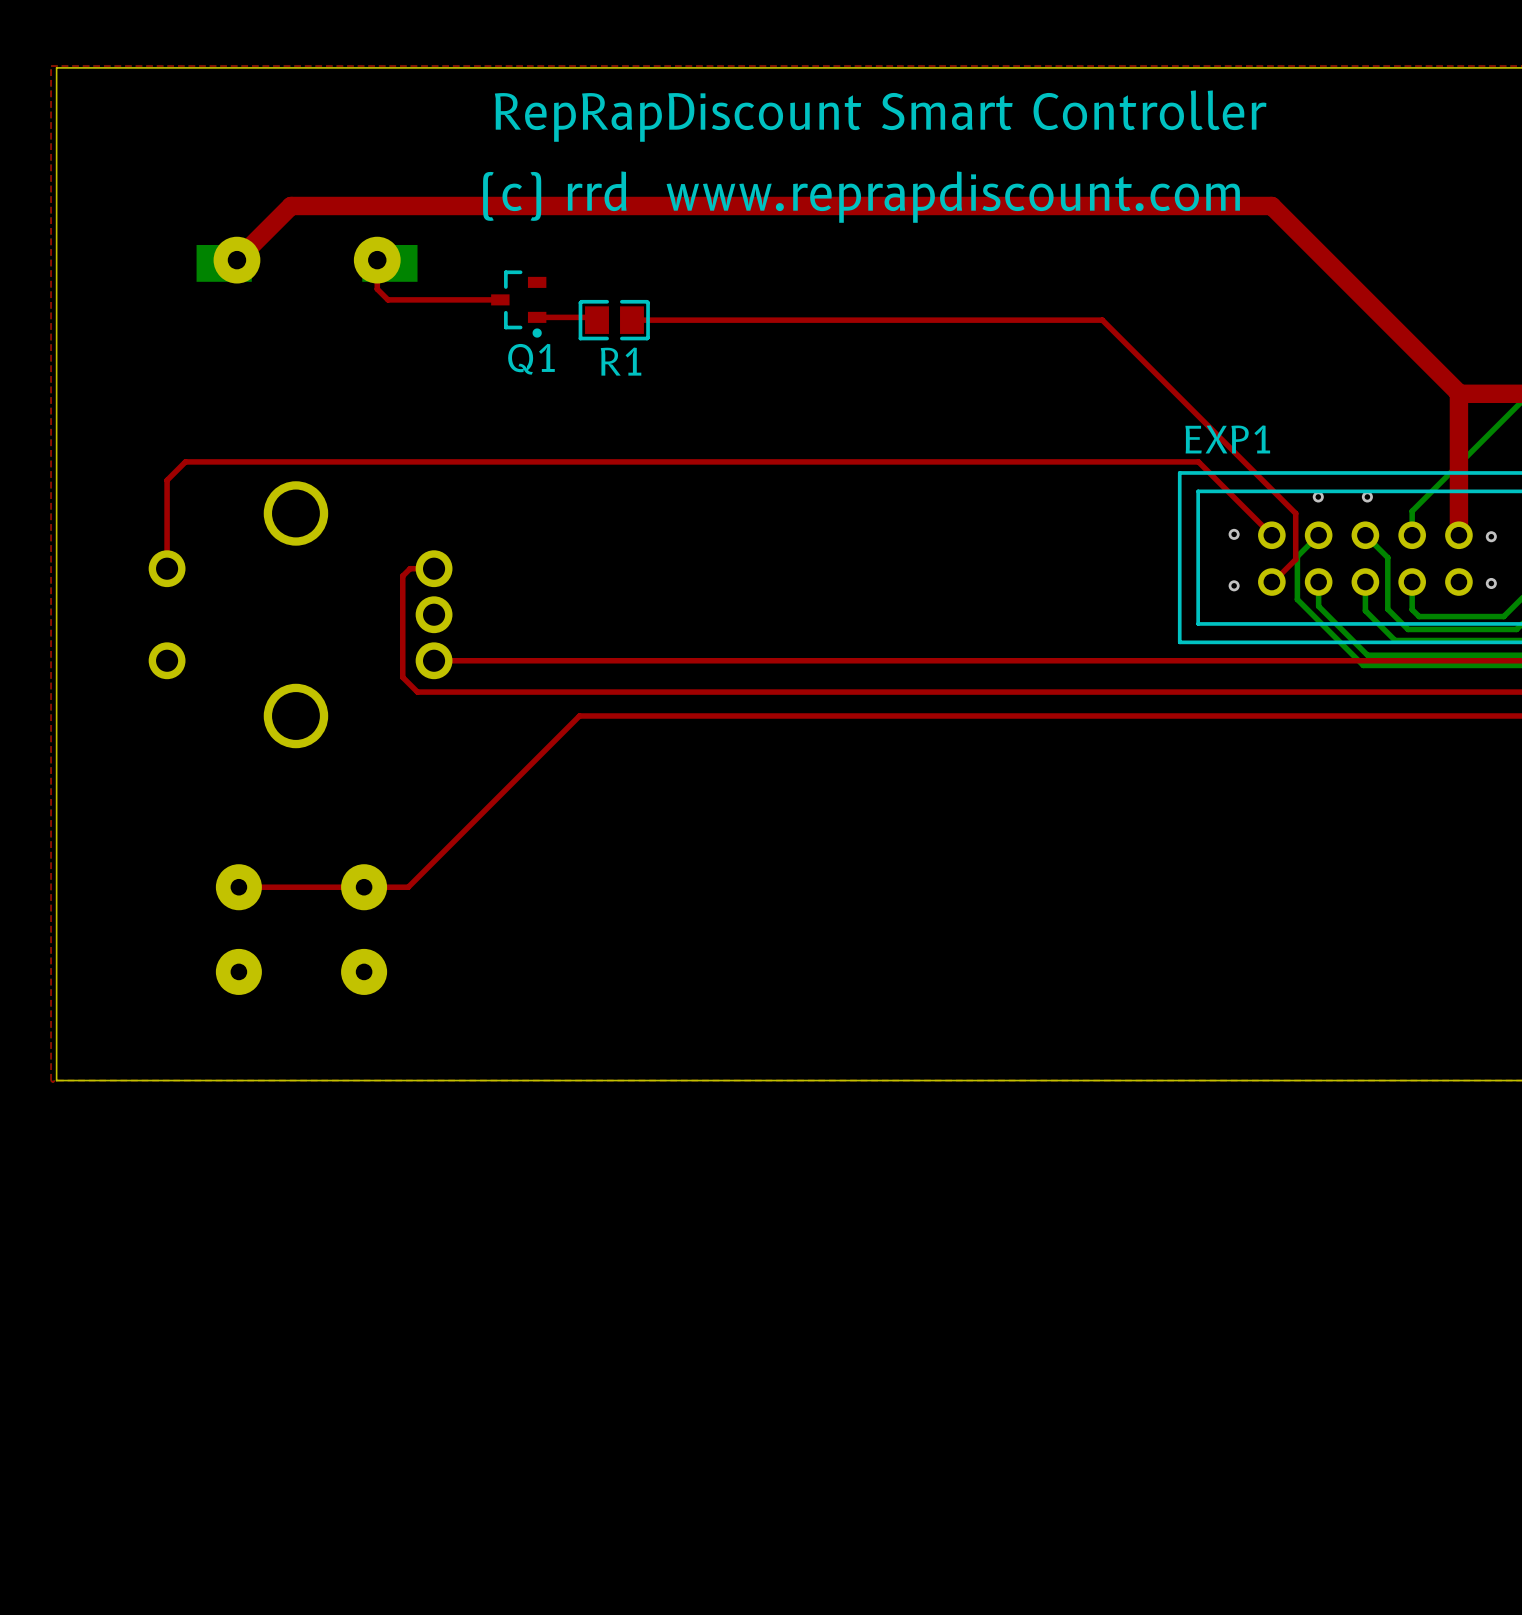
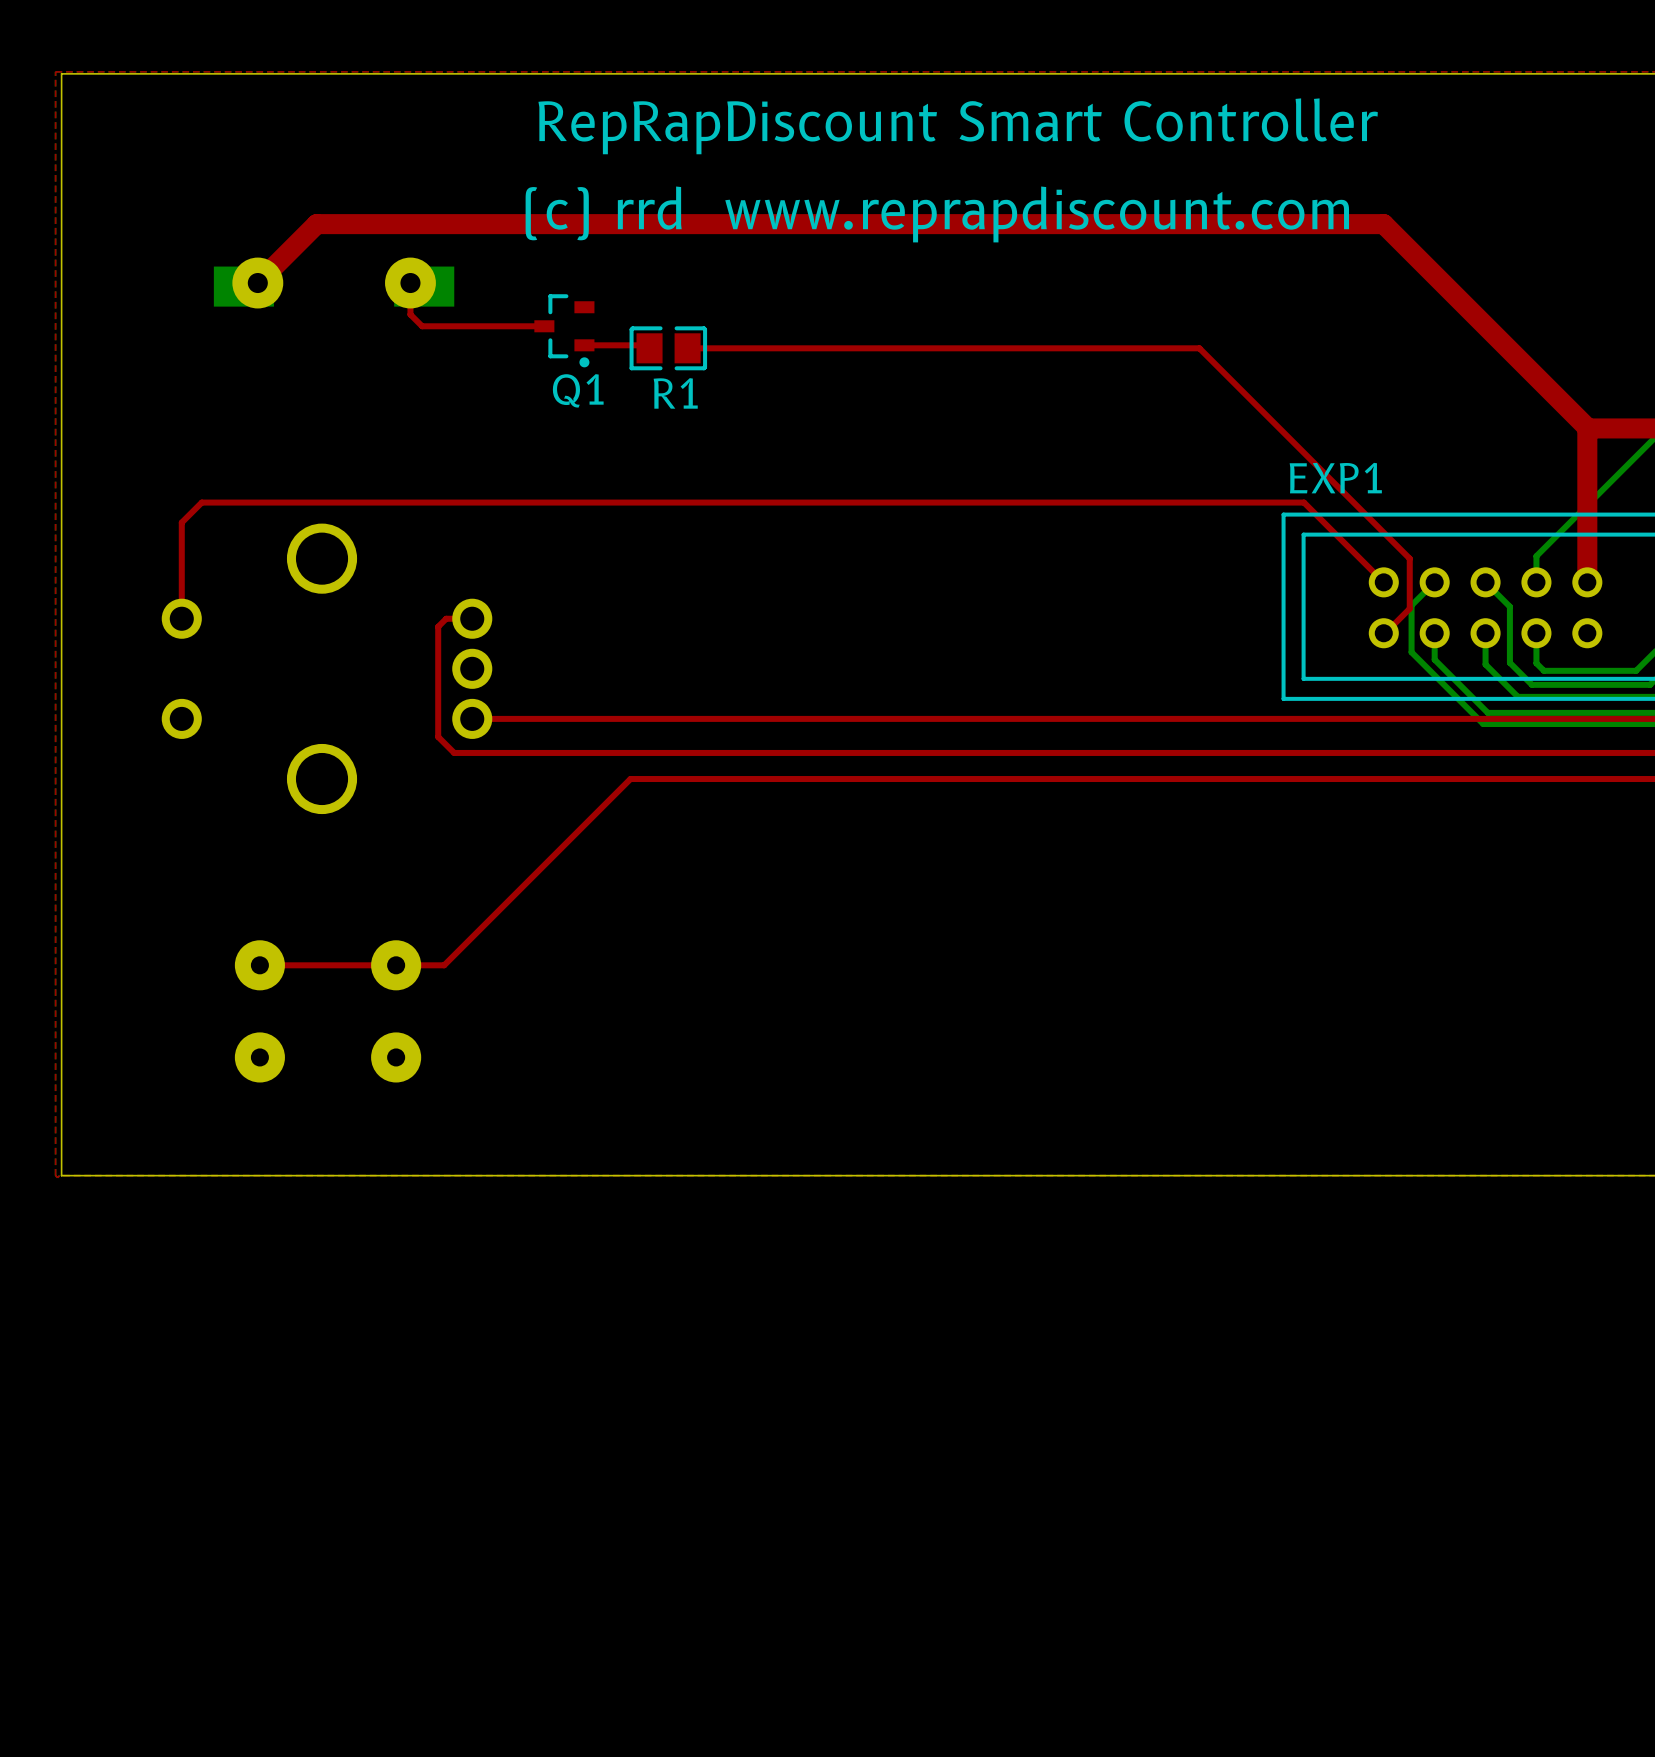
via: (1318, 496) -> none
via: (1367, 496) -> none
via: (1234, 534) -> none
via: (1491, 536) -> none
via: (1491, 583) -> none
via: (1234, 585) -> none

